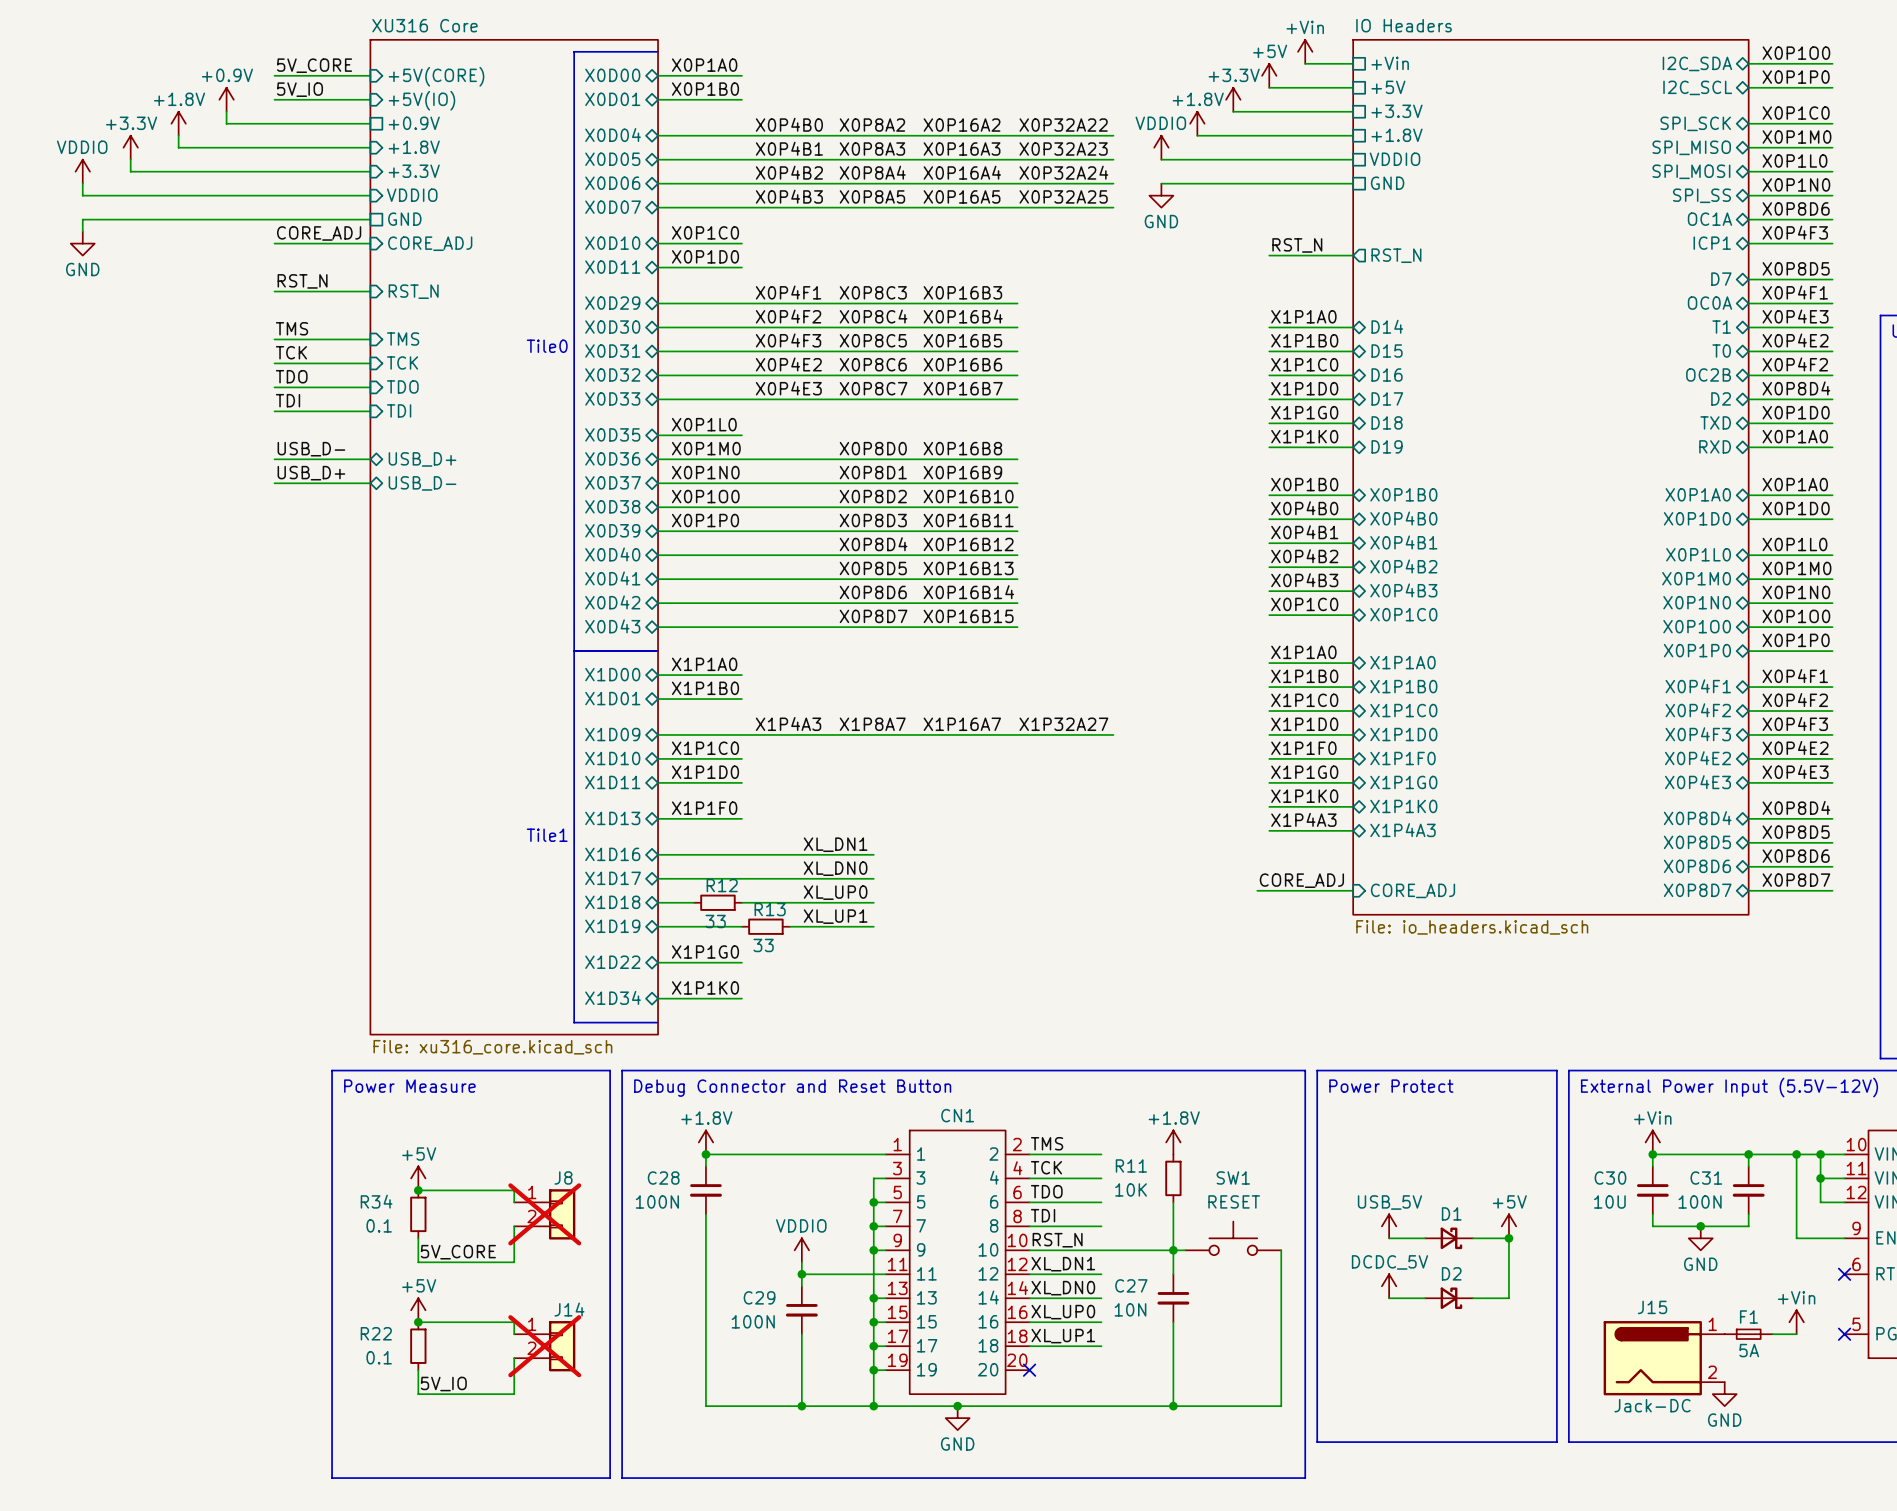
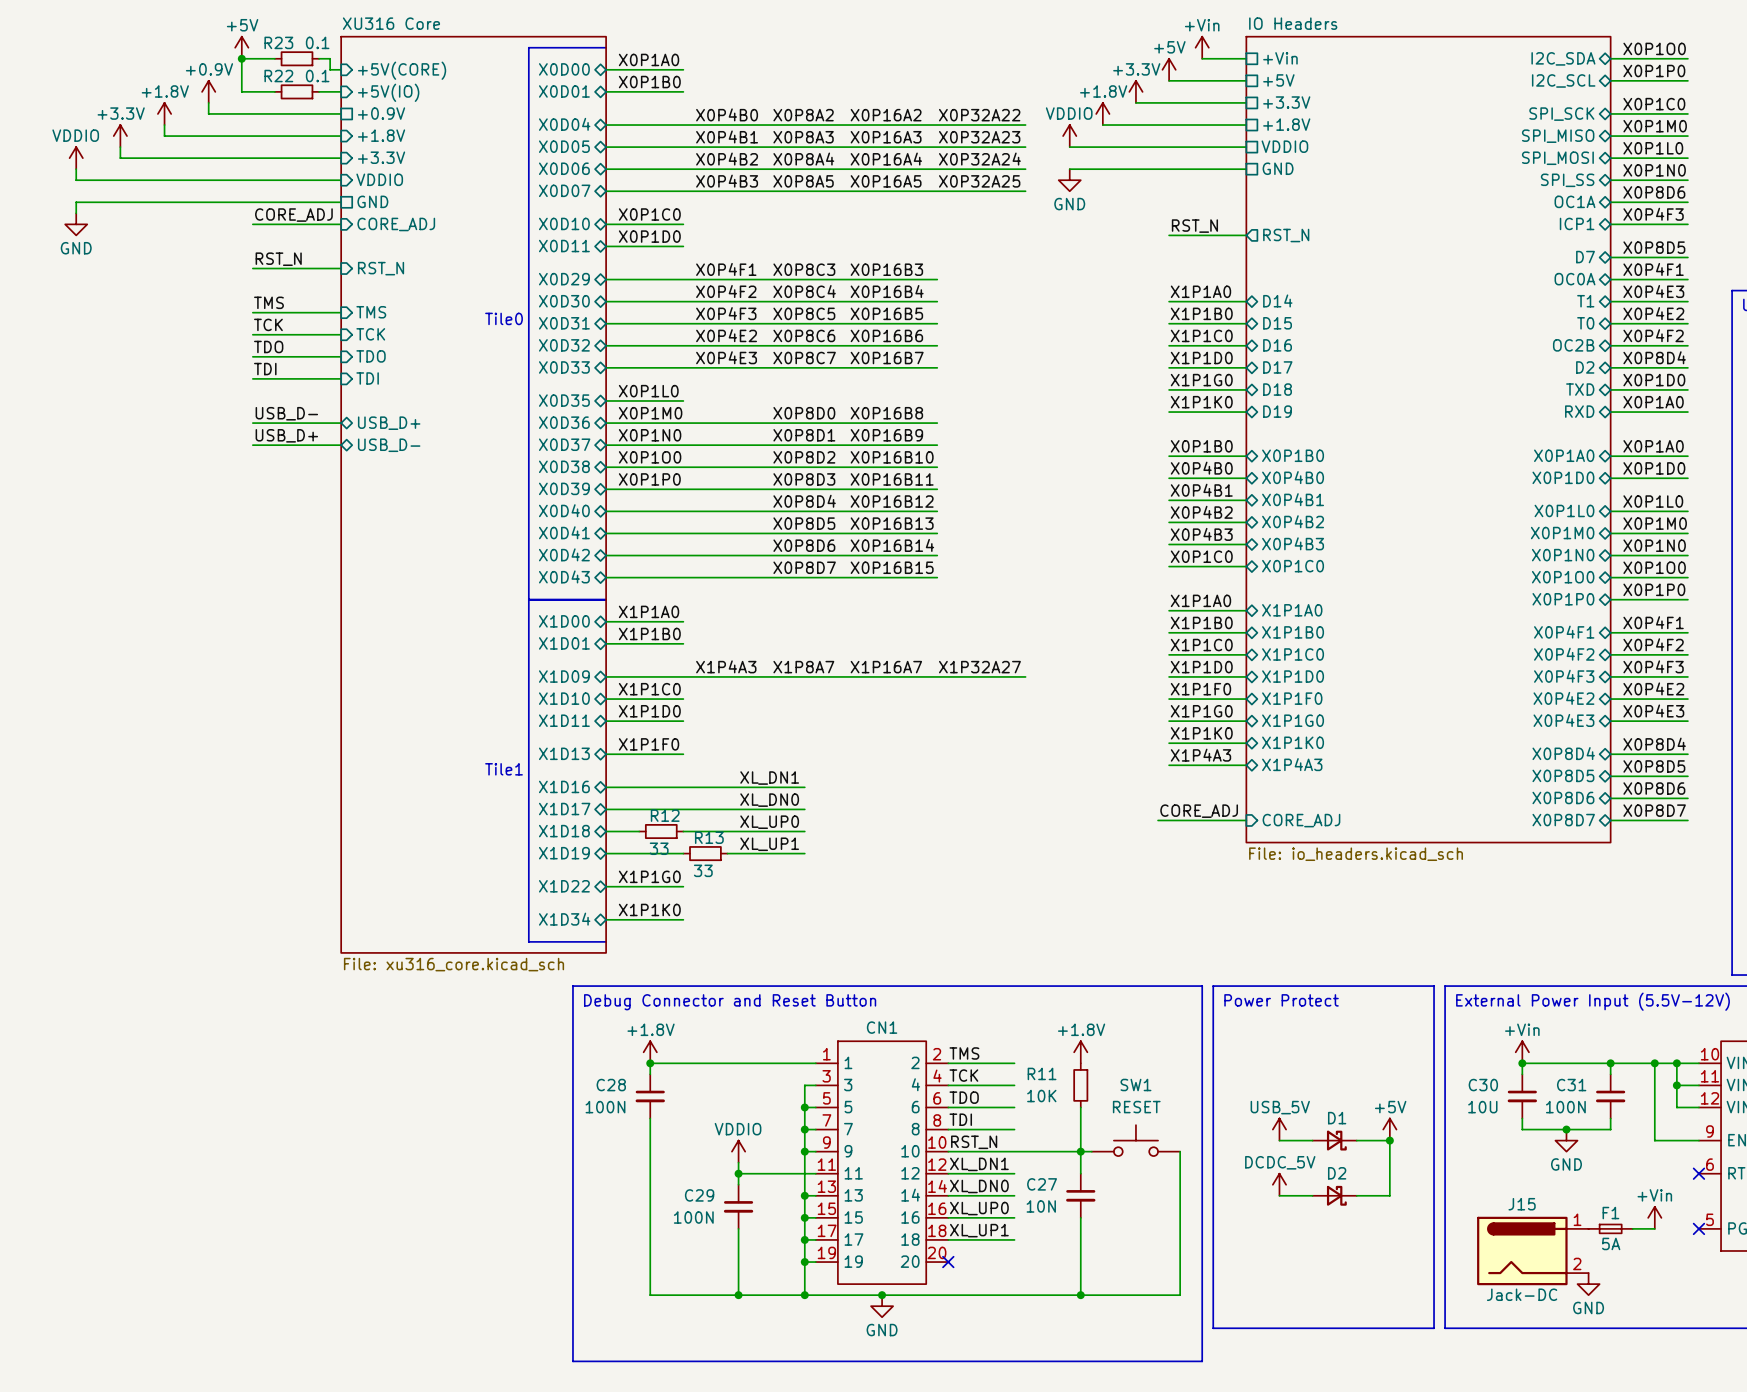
power symbol: none -> +5V (241, 47)
junction: none -> (241, 58)
wire: none -> (274, 58) (241, 58) (241, 91) (252, 91)
R23: none -> 0.1 (297, 58)
label: 5V_CORE (314, 65) -> none
wire: (274, 75) (358, 75) -> (319, 58) (330, 58) (330, 69)
label: 5V_IO (300, 89) -> none
wire: (298, 99) (346, 99) -> none
line: (332, 1070) (610, 1070) (610, 1478) (332, 1478) (332, 1070) -> none
text: Power Measure (409, 1086) -> none
power symbol: +5V (418, 1178) -> none
wire: (418, 1190) (514, 1190) (514, 1202) -> none
junction: (418, 1190) -> none
R34: 0.1 (418, 1214) -> none
J8: (544, 1214) -> none
wire: (514, 1226) (514, 1262) (418, 1262) (418, 1238) -> none
label: 5V_CORE (458, 1252) -> none
power symbol: +5V (418, 1310) -> none
wire: (418, 1322) (514, 1322) (514, 1334) -> none
junction: (418, 1322) -> none
R22 name position: R22 (376, 1333) -> R22 (278, 76)
R22 rotation: 0° (418, 1346) -> 90° clockwise (297, 91)
R22 position: (418, 1346) -> (297, 91)
J14: (544, 1346) -> none
R22 value position: 0.1 (379, 1357) -> 0.1 (317, 76)
wire: (514, 1358) (514, 1394) (418, 1394) (418, 1370) -> none
label: 5V_IO (443, 1384) -> none

